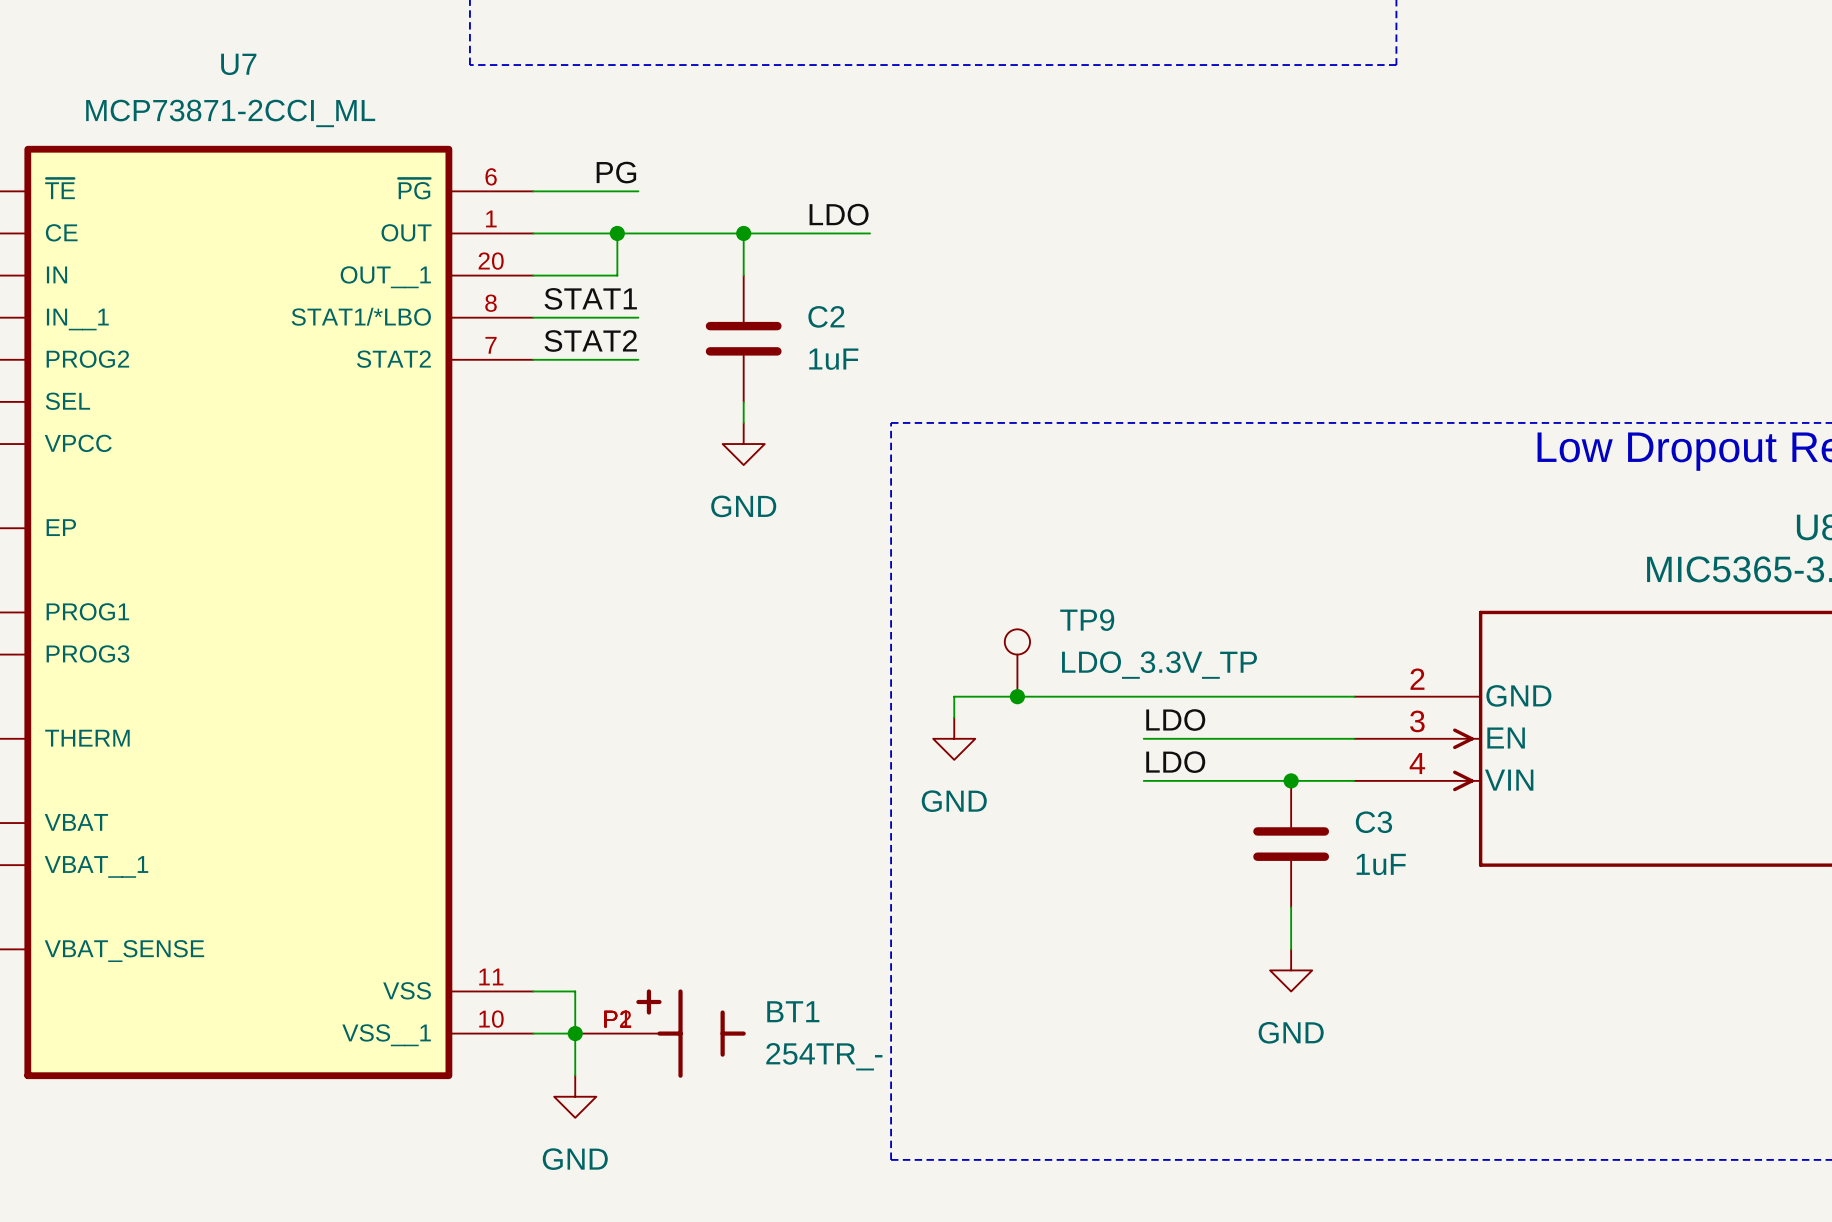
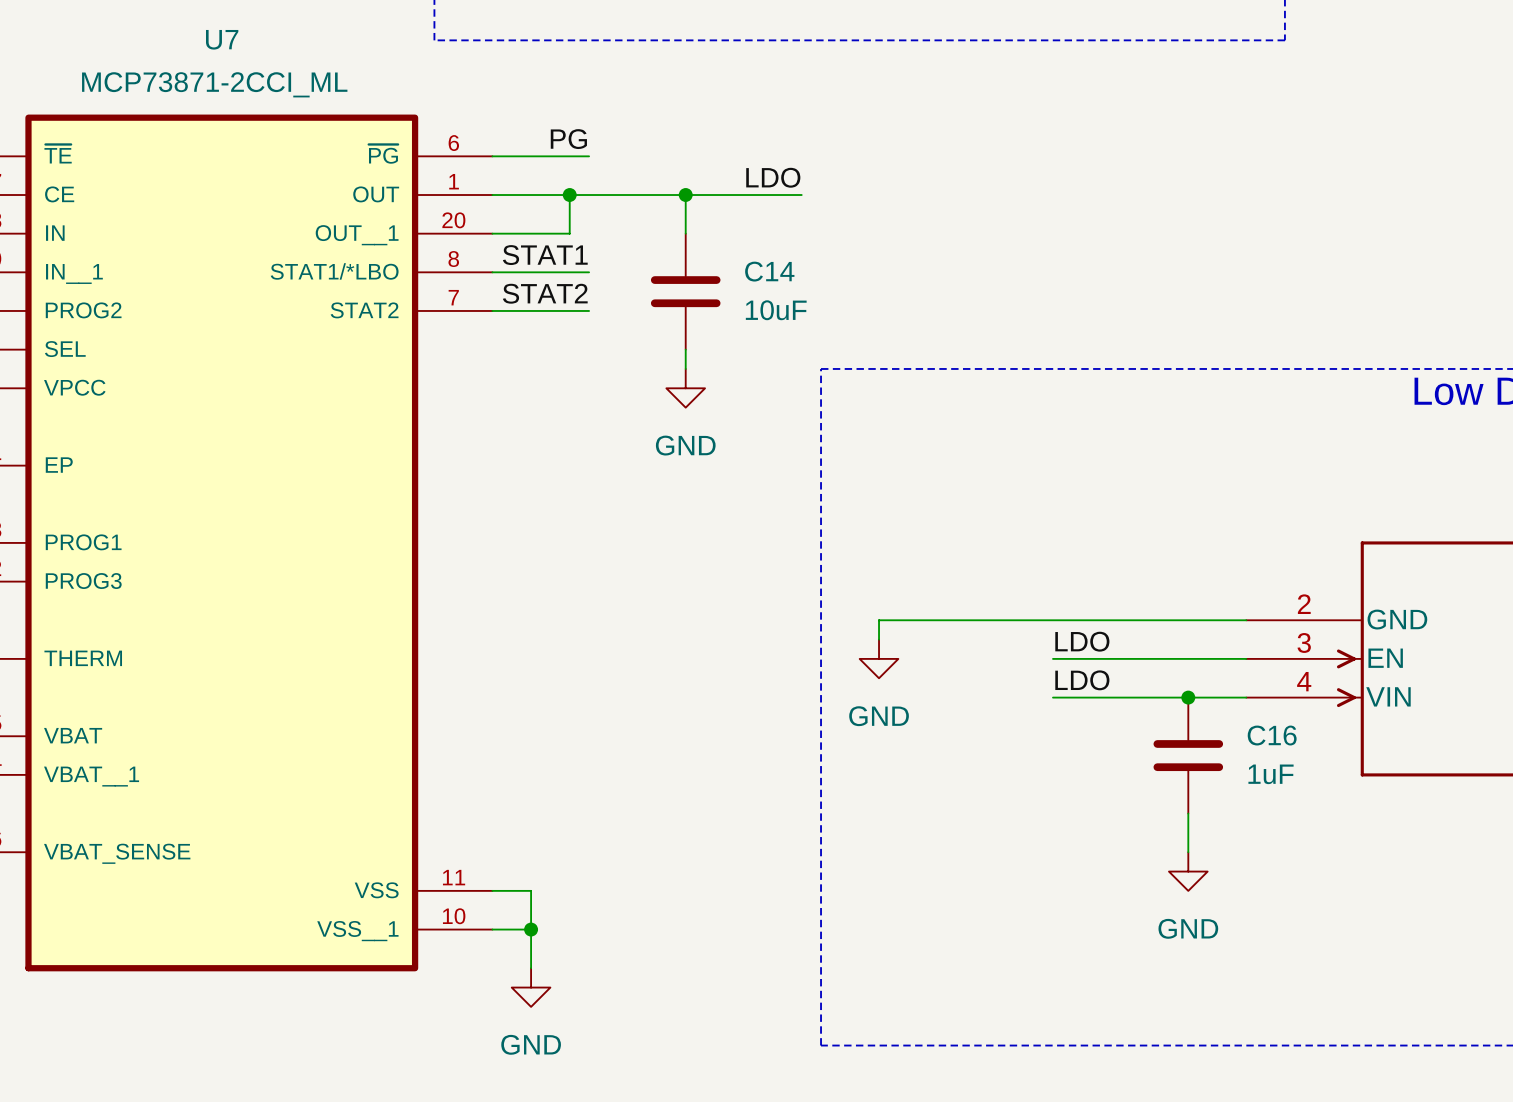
C2 name: C2 (826, 316) -> C14 (769, 271)
C2 value: 1uF (833, 359) -> 10uF (776, 310)
TP9: LDO_3.3V_TP (1017, 663) -> none
junction: (1017, 696) -> none
C3 name: C3 (1373, 822) -> C16 (1272, 735)
BT1: 254TR_- (660, 1033) -> none

